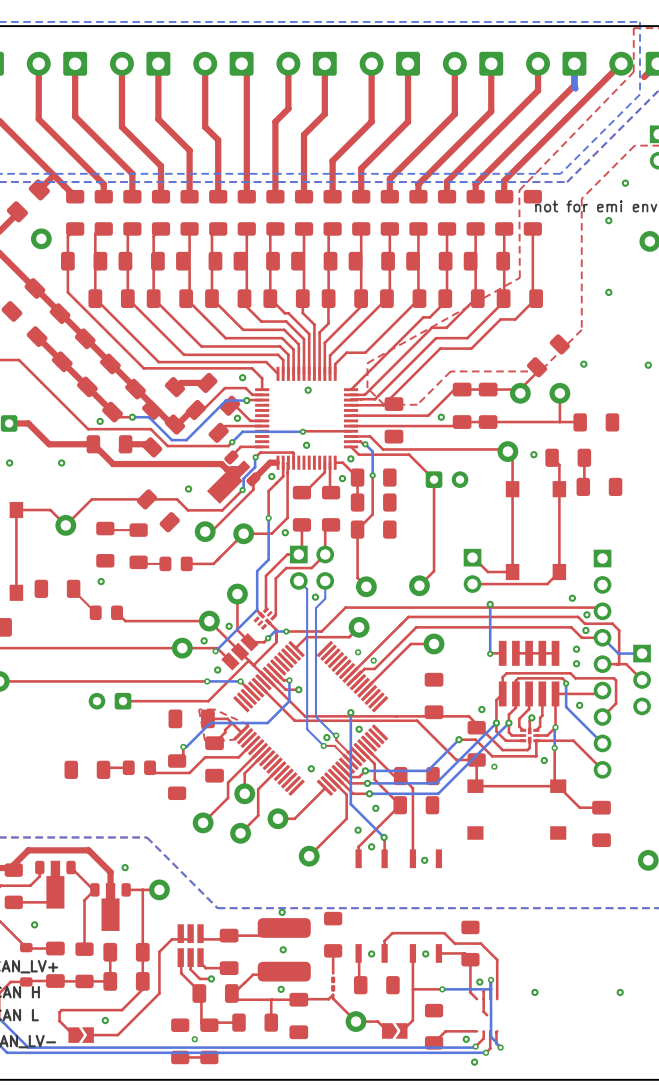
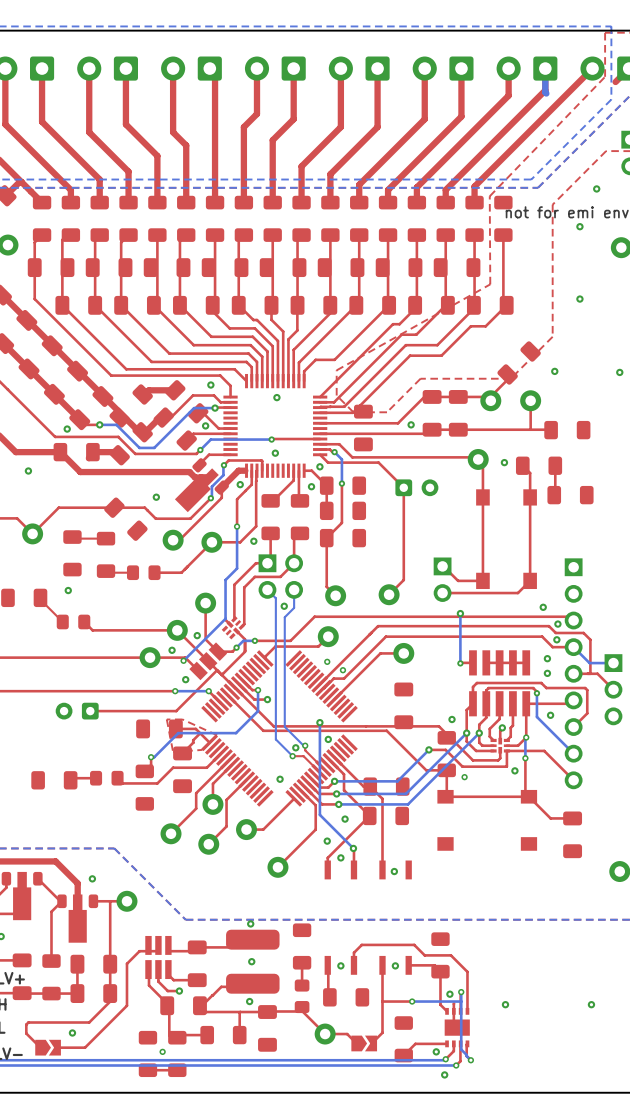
part footprint: [331, 976, 336, 992] -> [294, 979, 310, 1014]
part: none -> (457, 1027)

